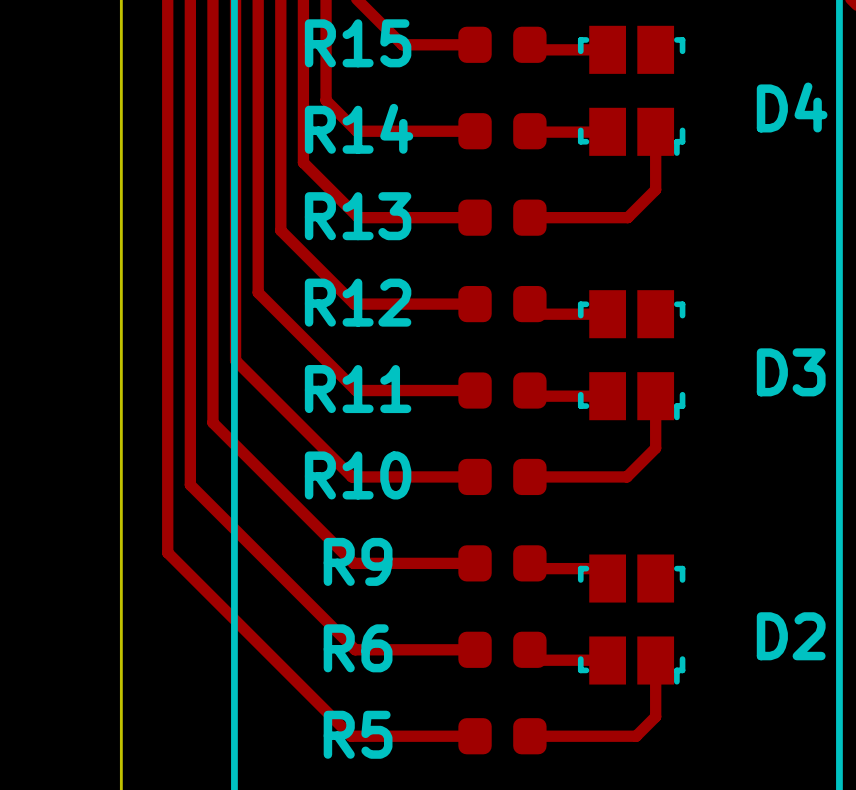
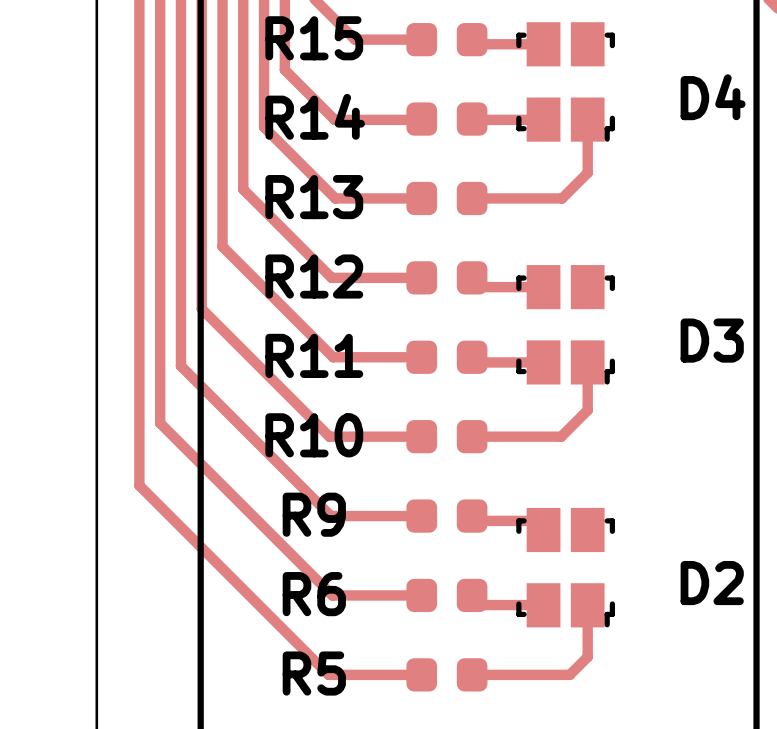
track: (326, 77) (326, 100) (356, 131) (475, 131) -> (284, 70) (334, 119) (421, 119)
track: (303, 140) (303, 162) (358, 217) (381, 217) -> (264, 127) (335, 198)
track: (280, 207) (280, 230) (354, 304) (377, 304) -> (243, 189) (331, 277)
track: (258, 270) (258, 292) (356, 390) (475, 390) -> (222, 246) (333, 357) (421, 357)
track: (235, 337) (235, 360) (351, 476) (374, 476) -> (201, 308) (329, 436)
track: (212, 400) (212, 422) (353, 563) (376, 563) -> (180, 366) (330, 516)
track: (190, 462) (190, 484) (355, 649) (377, 649) -> (160, 423) (332, 595)
track: (167, 530) (167, 552) (351, 736) (373, 736) -> (139, 485) (328, 674)

